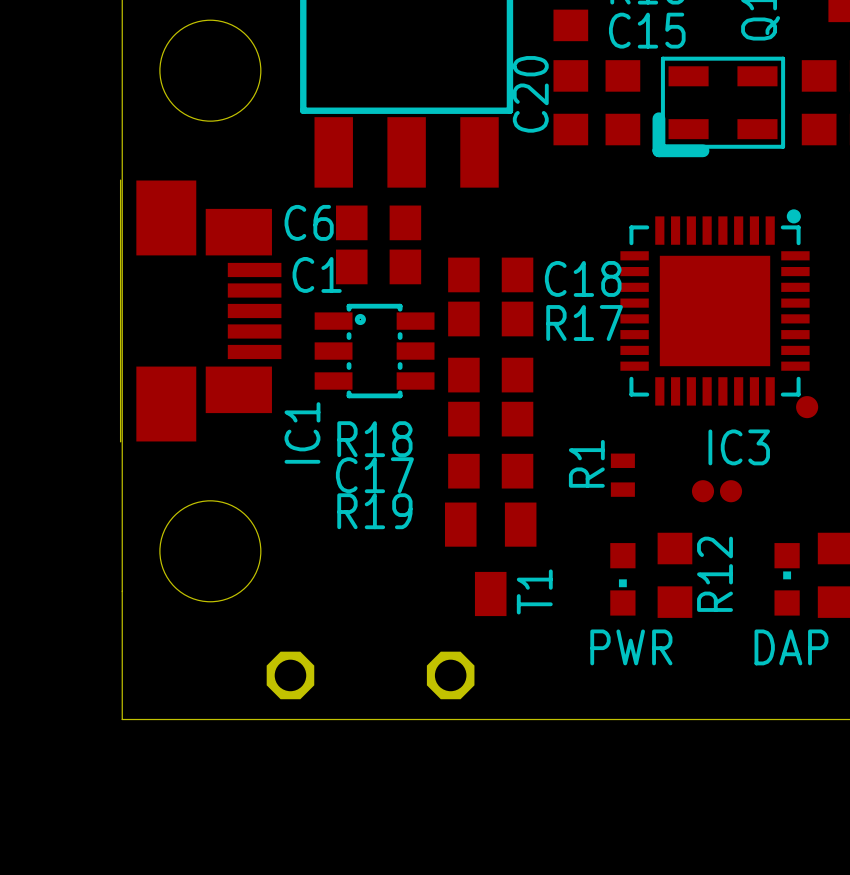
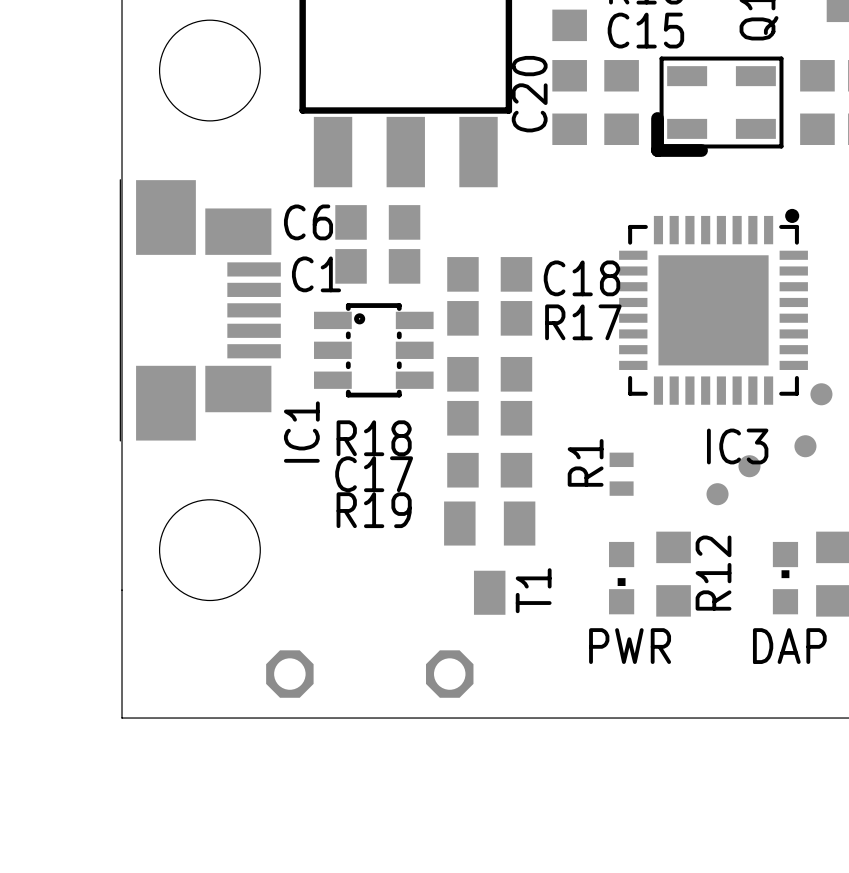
part: none -> (821, 394)
part: (807, 407) -> none
part: none -> (805, 446)
part: none -> (749, 466)
part: (702, 491) -> none
part: (731, 491) -> none
part: none -> (717, 494)

